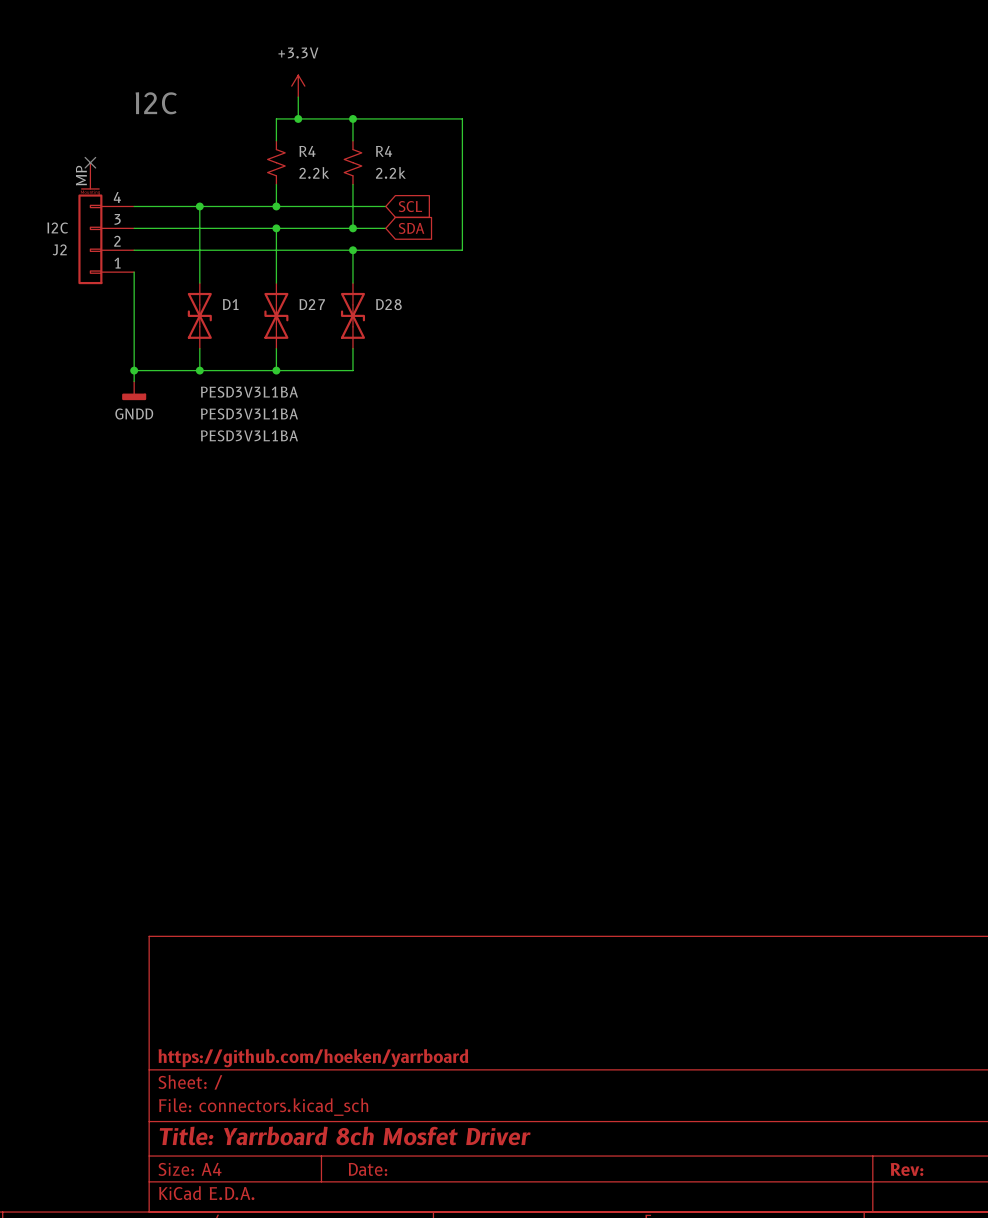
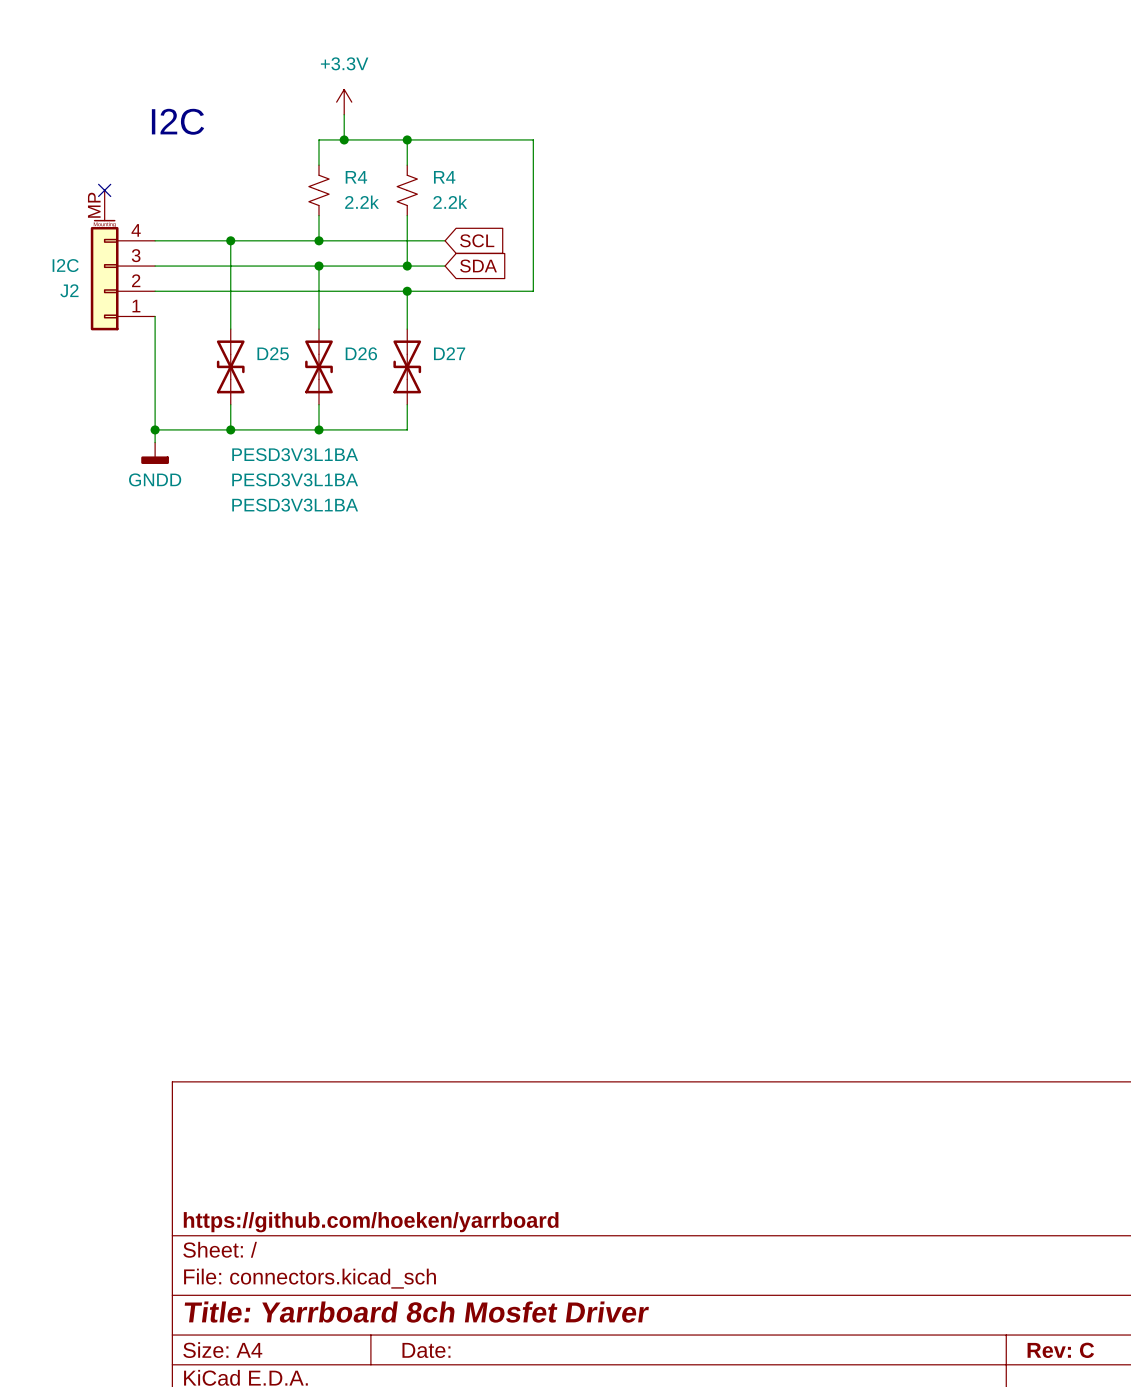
D1 name: D1 (230, 304) -> D25 (273, 353)
D27 name: D27 (312, 304) -> D26 (361, 353)
D28 name: D28 (388, 304) -> D27 (449, 353)
title block: Rev: (907, 1169) -> Rev: C (1060, 1350)

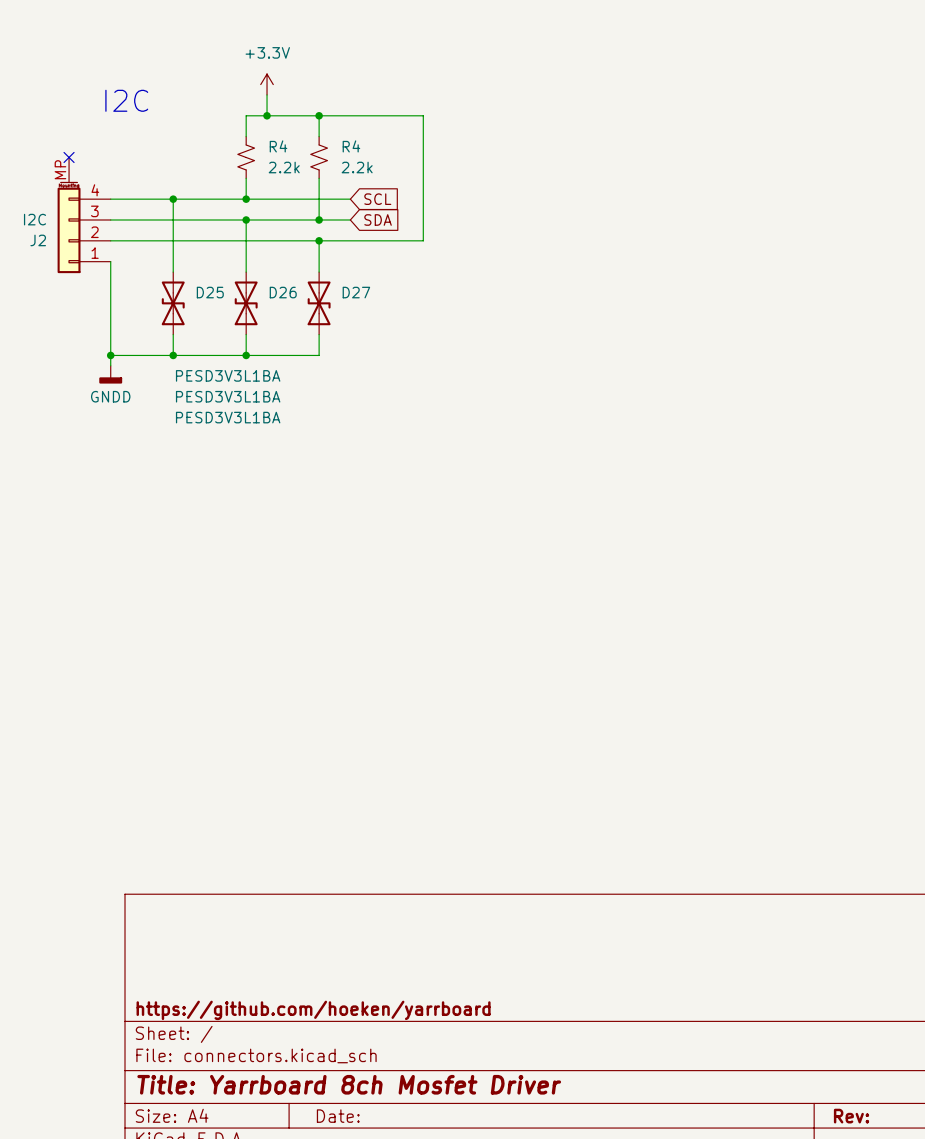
title block: Rev: C (1060, 1350) -> Rev: (851, 1116)

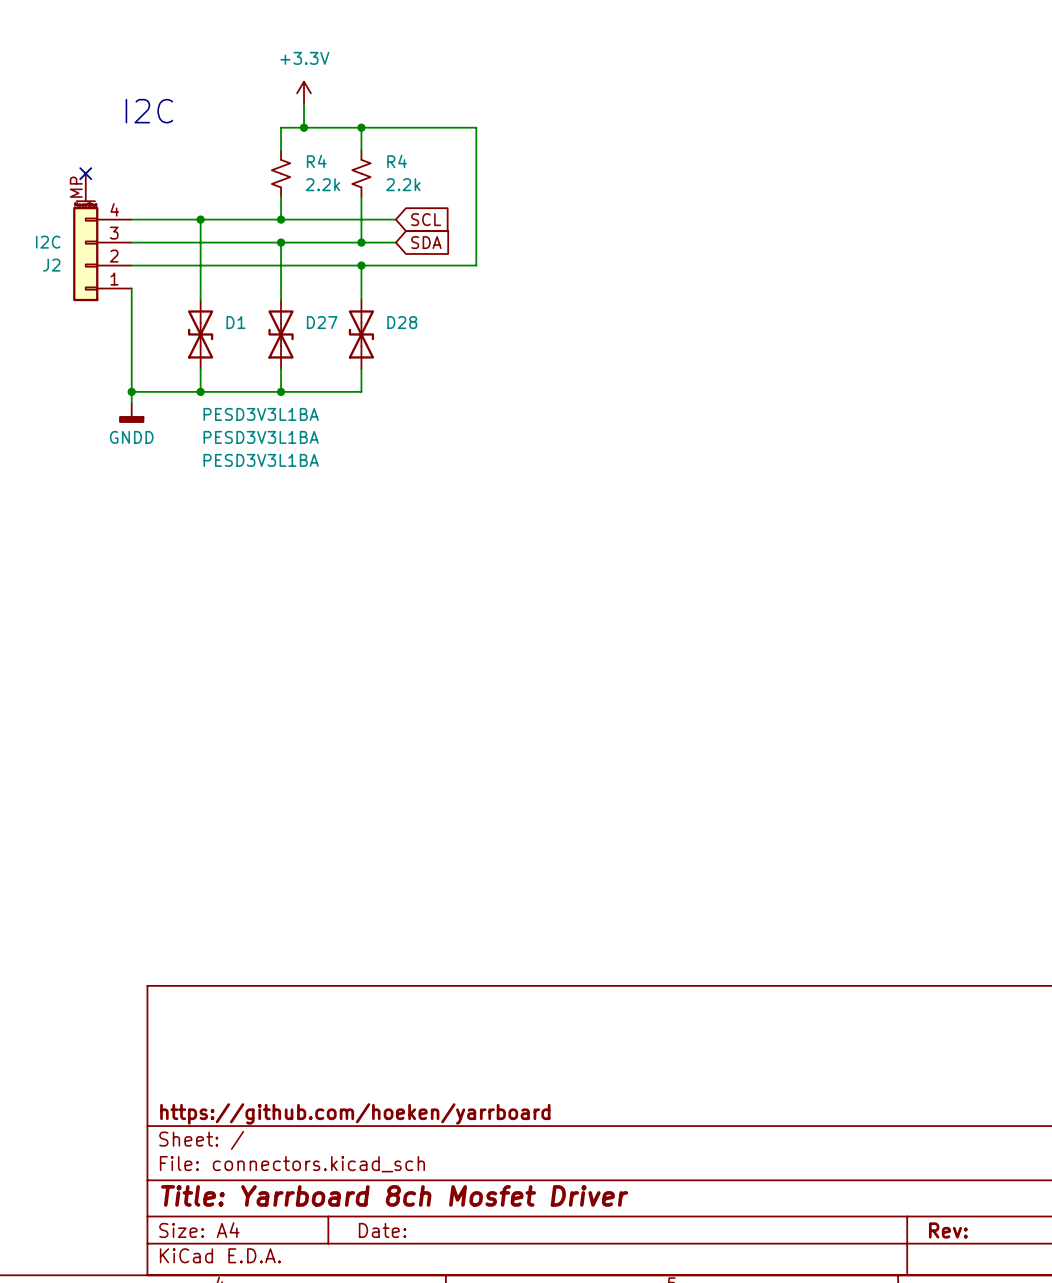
D25 name: D25 (210, 292) -> D1 (235, 322)
D26 name: D26 (283, 292) -> D27 (322, 322)
D27 name: D27 (356, 292) -> D28 (402, 322)

